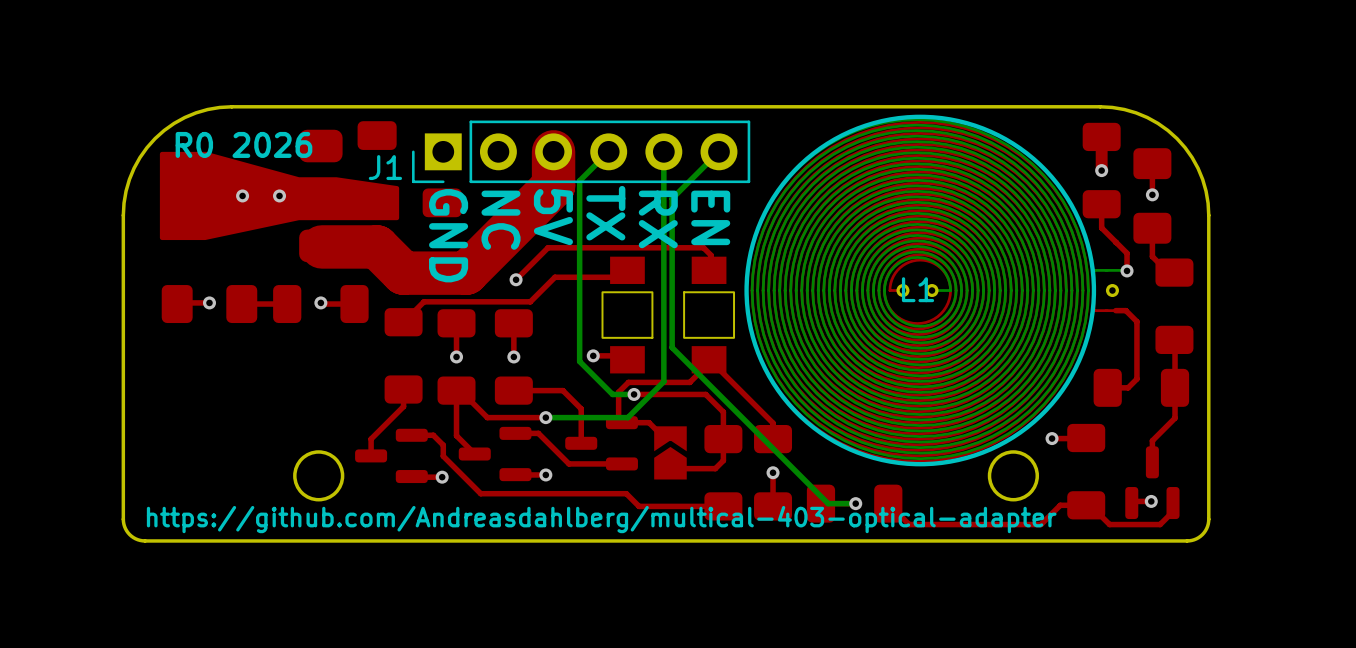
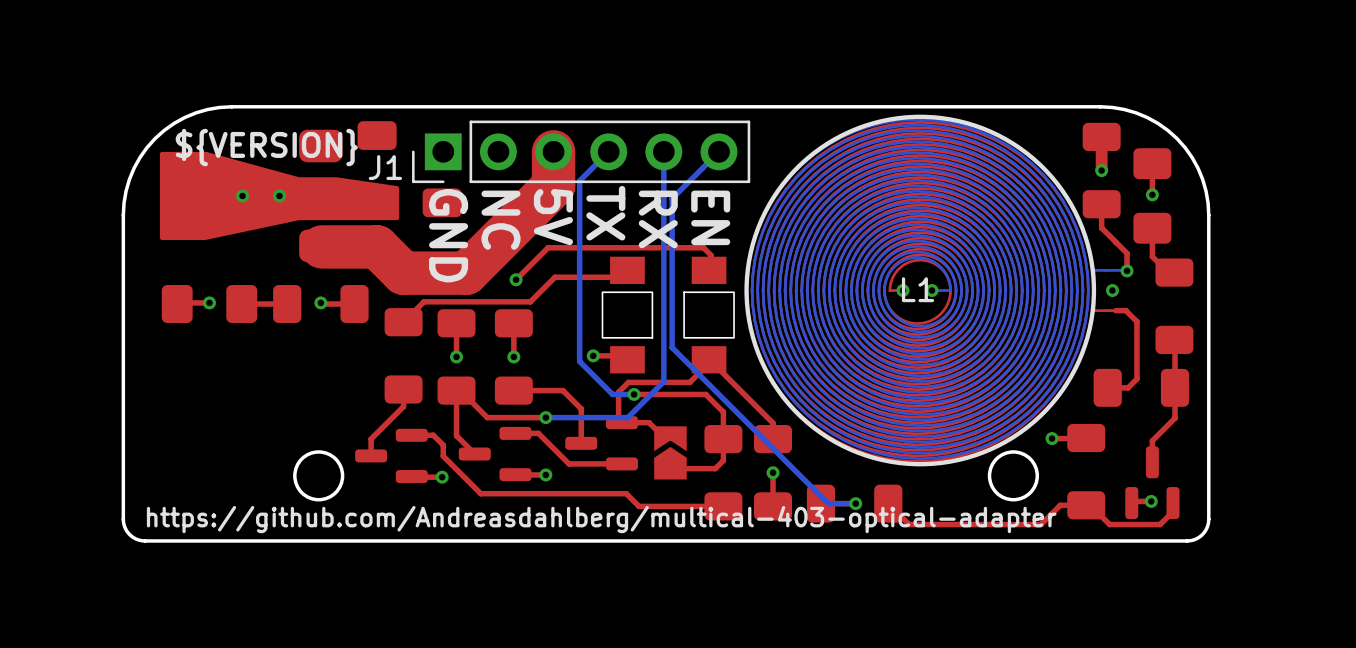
text: R0 2026 (243, 144) -> ${VERSION} (266, 147)

